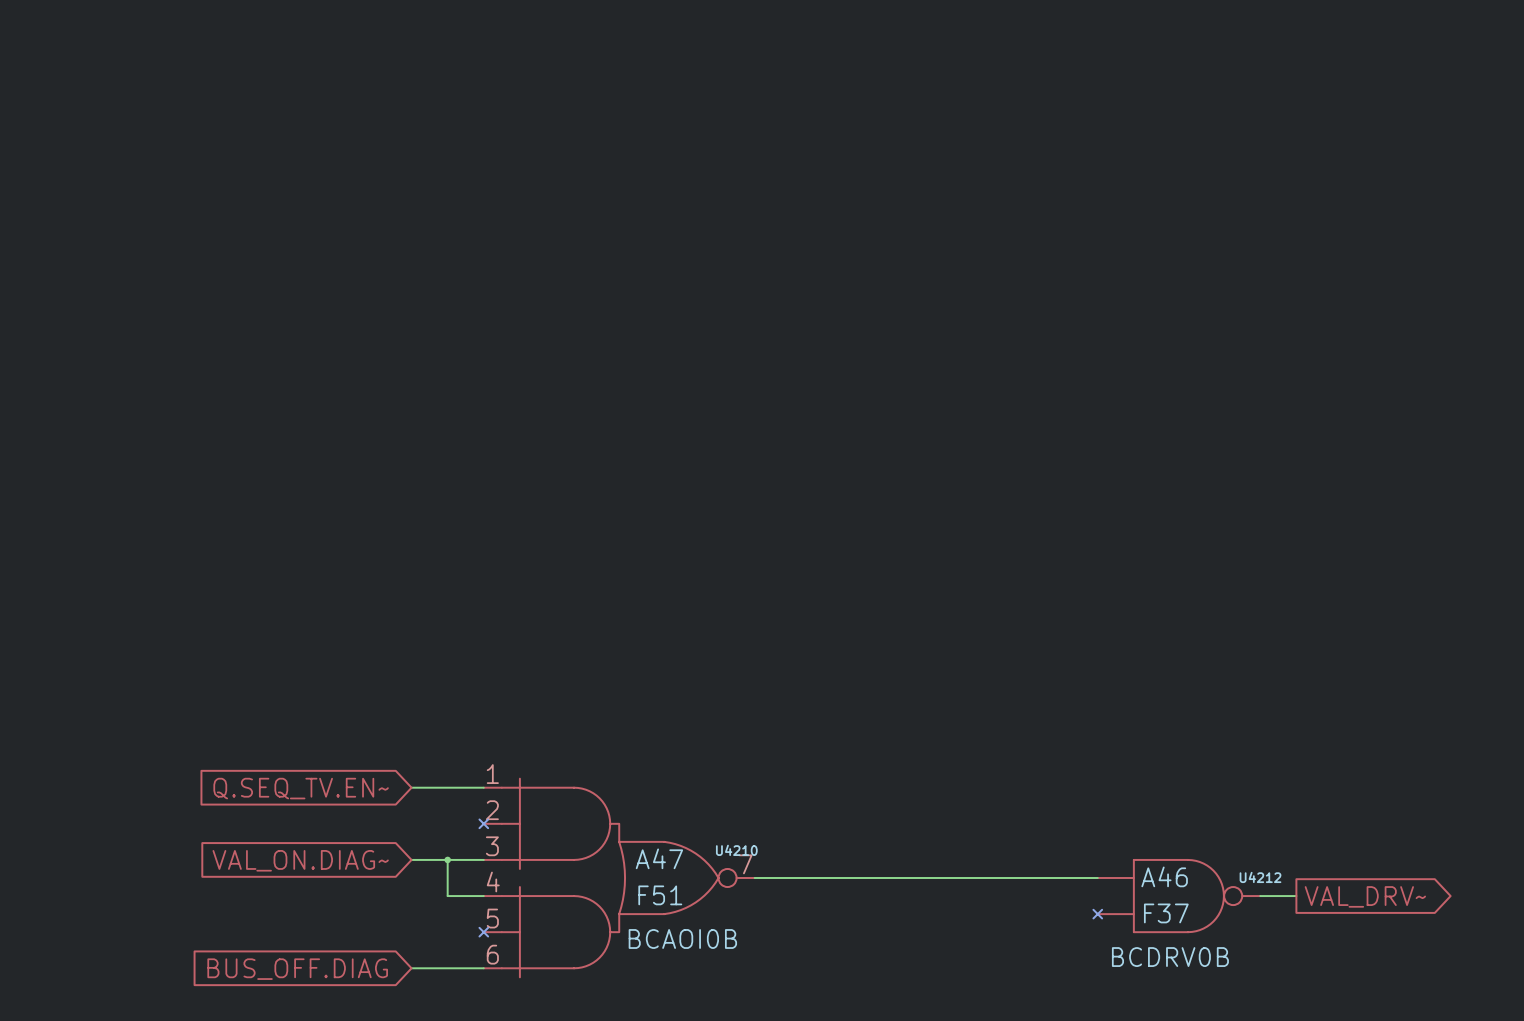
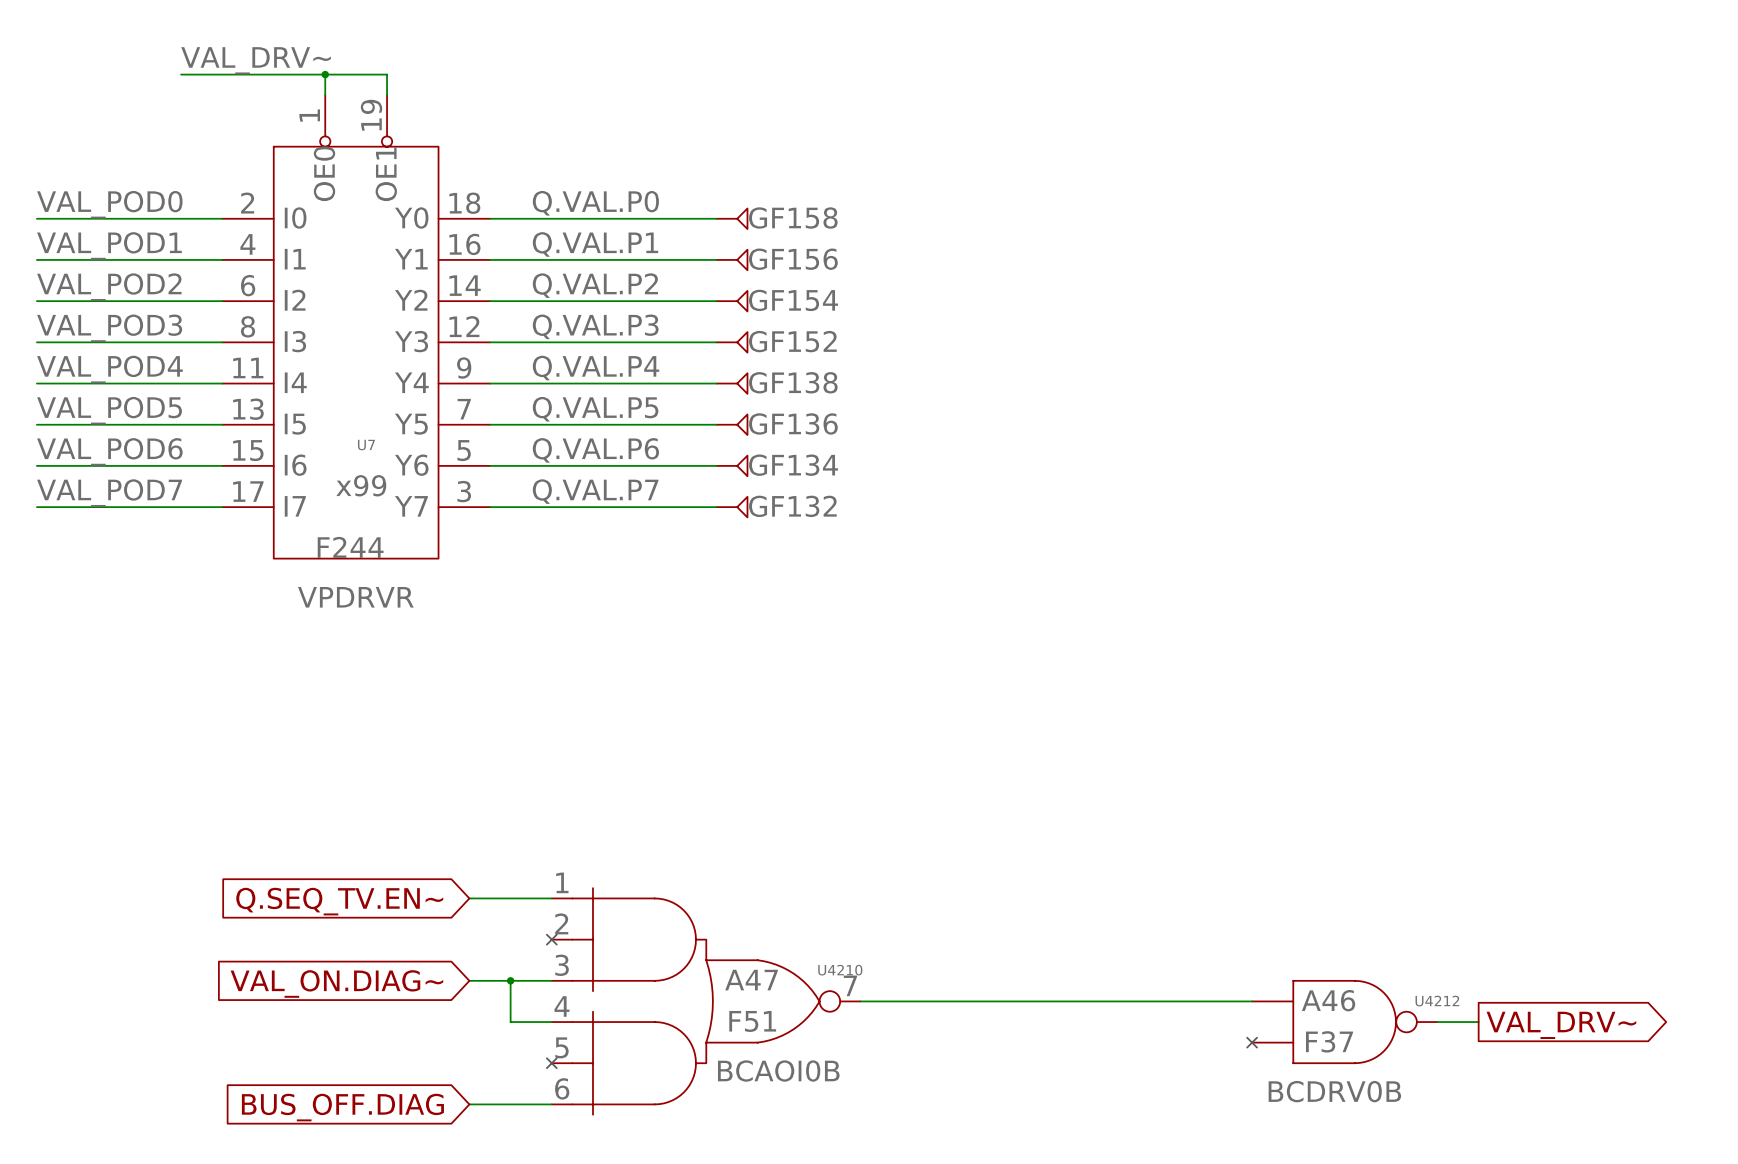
label: none -> VAL_DRV~ (256, 60)
wire: none -> (181, 74) (387, 74) (387, 95)
wire: none -> (325, 74) (325, 95)
junction: none -> (325, 74)
label: none -> VAL_POD0 (109, 204)
label: none -> Q.VAL.P0 (595, 203)
wire: none -> (36, 218) (222, 218)
wire: none -> (490, 218) (716, 218)
GF158: none -> (732, 218)
label: none -> VAL_POD1 (109, 245)
label: none -> Q.VAL.P1 (595, 244)
wire: none -> (36, 259) (222, 259)
wire: none -> (490, 259) (716, 259)
GF156: none -> (732, 259)
label: none -> VAL_POD2 (109, 287)
label: none -> Q.VAL.P2 (595, 285)
wire: none -> (36, 301) (222, 301)
wire: none -> (490, 301) (716, 301)
GF154: none -> (732, 301)
label: none -> VAL_POD3 (109, 328)
label: none -> Q.VAL.P3 (595, 326)
U7: none -> F244 (356, 326)
wire: none -> (36, 342) (222, 342)
wire: none -> (490, 342) (716, 342)
GF152: none -> (732, 342)
label: none -> VAL_POD4 (109, 369)
label: none -> Q.VAL.P4 (596, 368)
wire: none -> (36, 383) (222, 383)
wire: none -> (490, 383) (716, 383)
GF138: none -> (732, 383)
label: none -> VAL_POD5 (109, 410)
label: none -> Q.VAL.P5 (595, 409)
wire: none -> (36, 424) (222, 424)
wire: none -> (490, 424) (716, 424)
GF136: none -> (732, 424)
label: none -> VAL_POD6 (109, 451)
label: none -> Q.VAL.P6 (595, 450)
wire: none -> (36, 465) (222, 465)
wire: none -> (490, 465) (716, 465)
GF134: none -> (732, 465)
label: none -> VAL_POD7 (109, 493)
label: none -> Q.VAL.P7 (595, 491)
wire: none -> (36, 507) (222, 507)
wire: none -> (490, 507) (716, 507)
GF132: none -> (732, 507)

